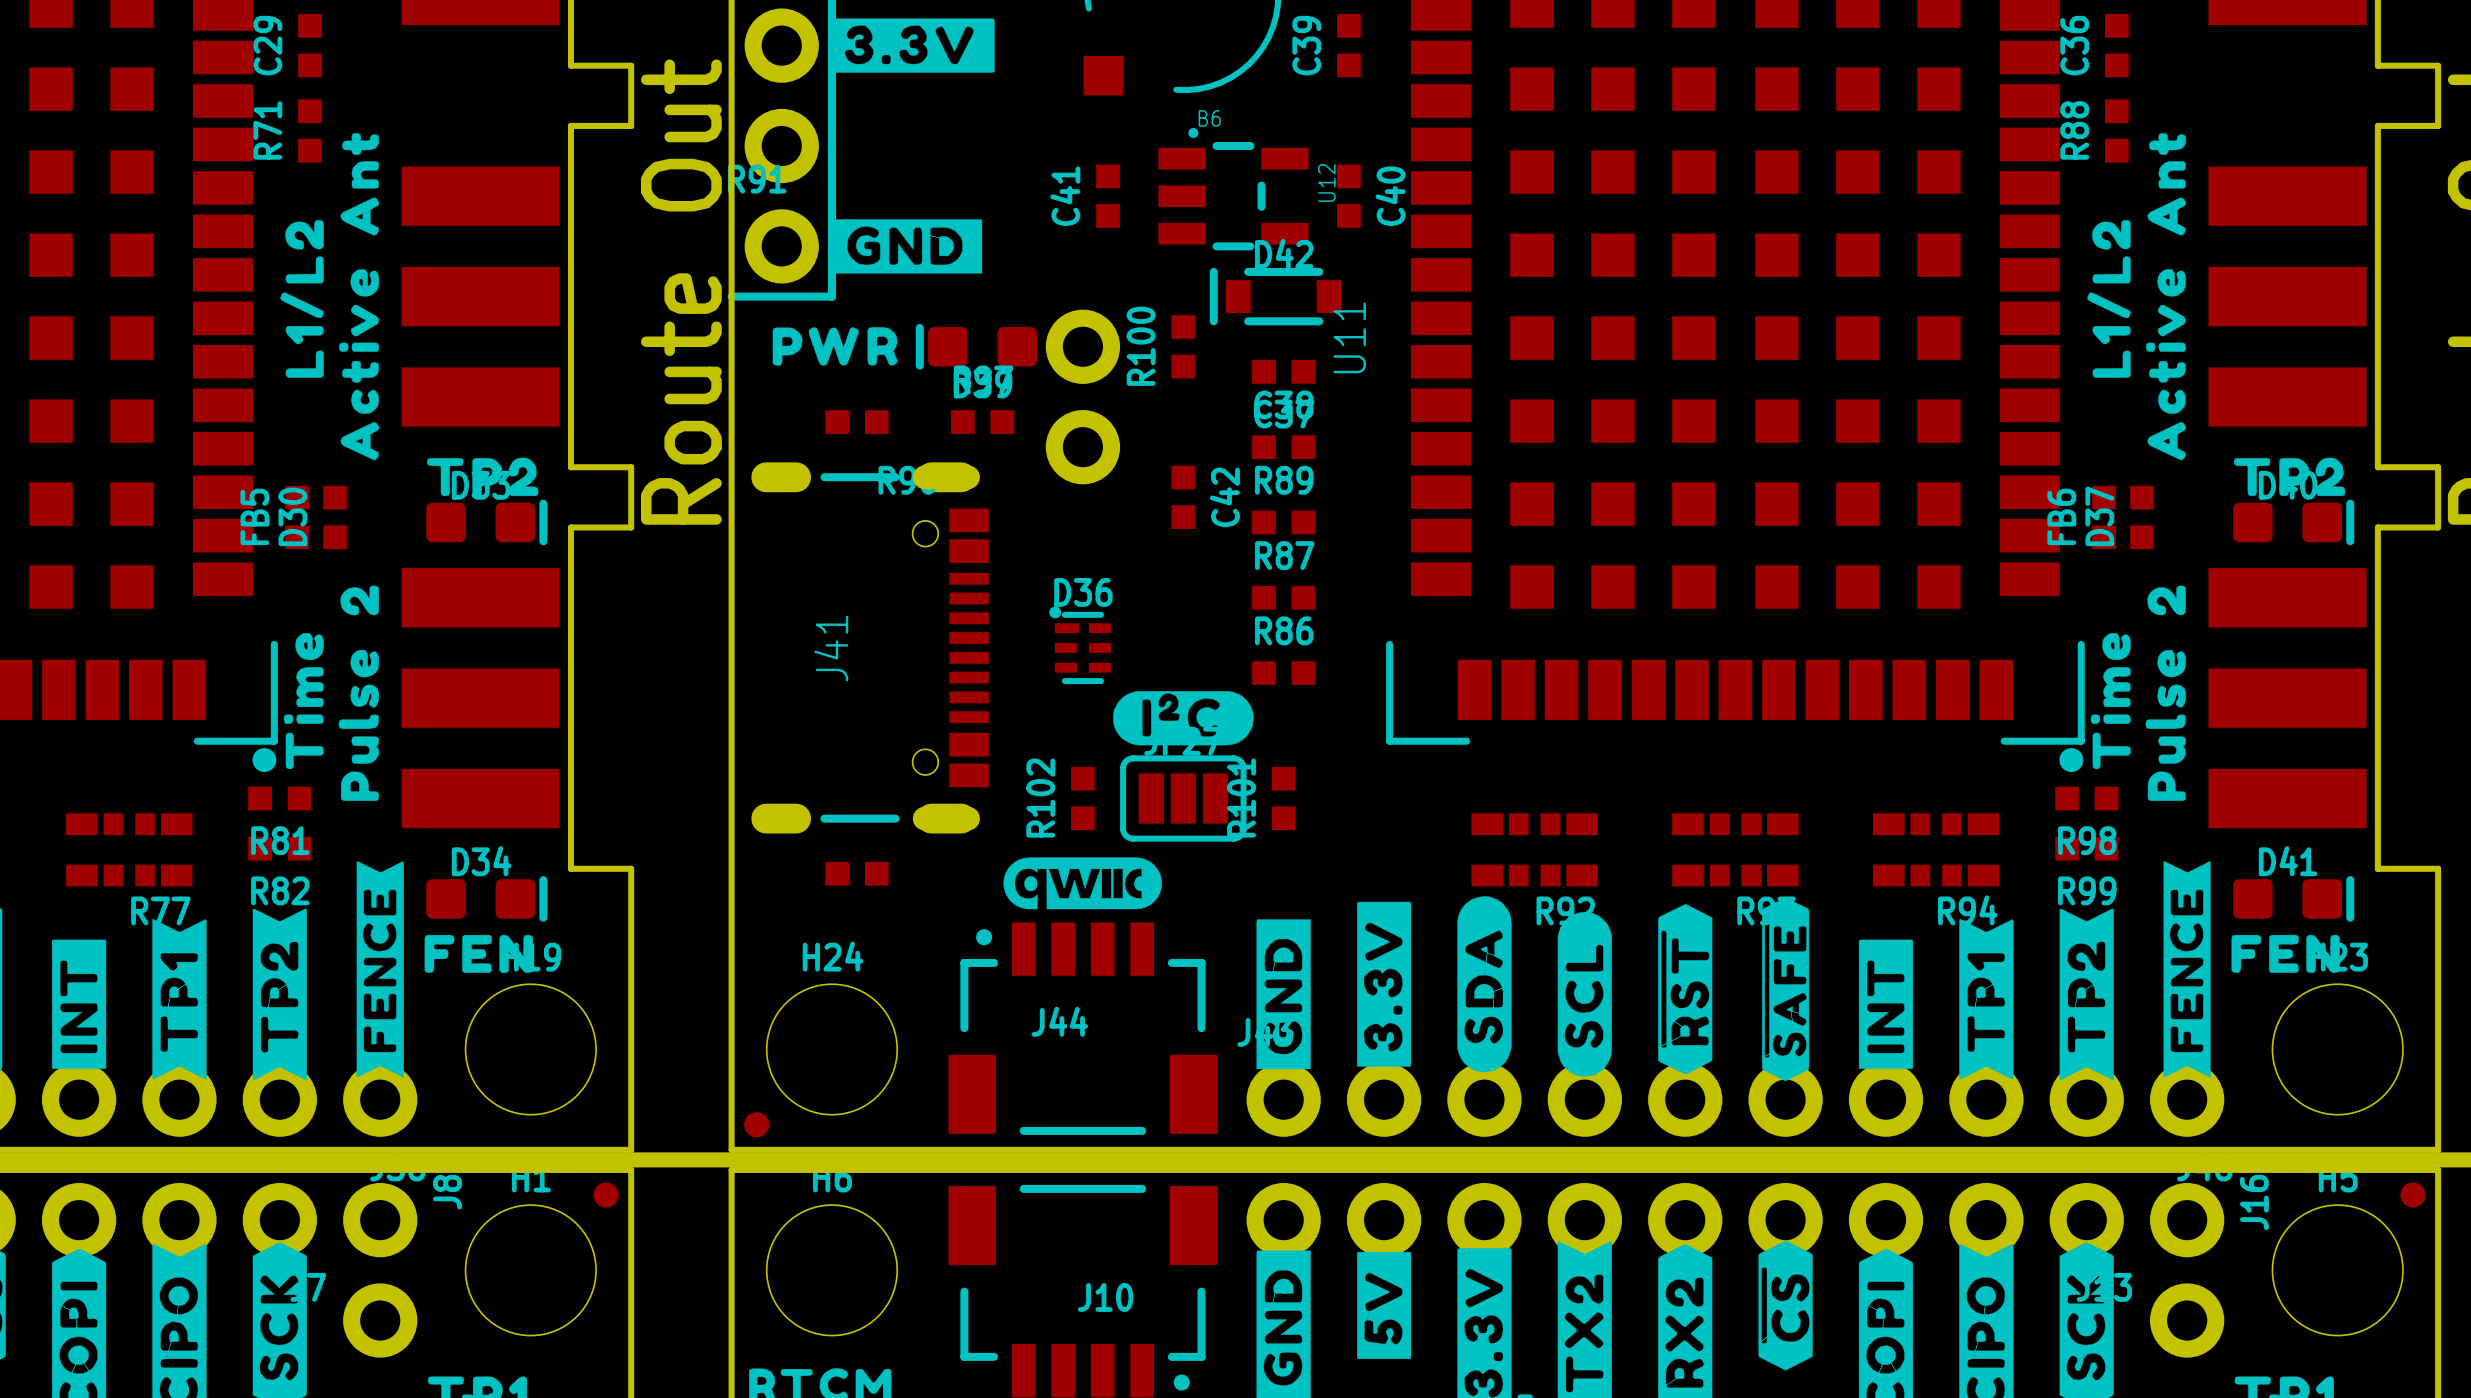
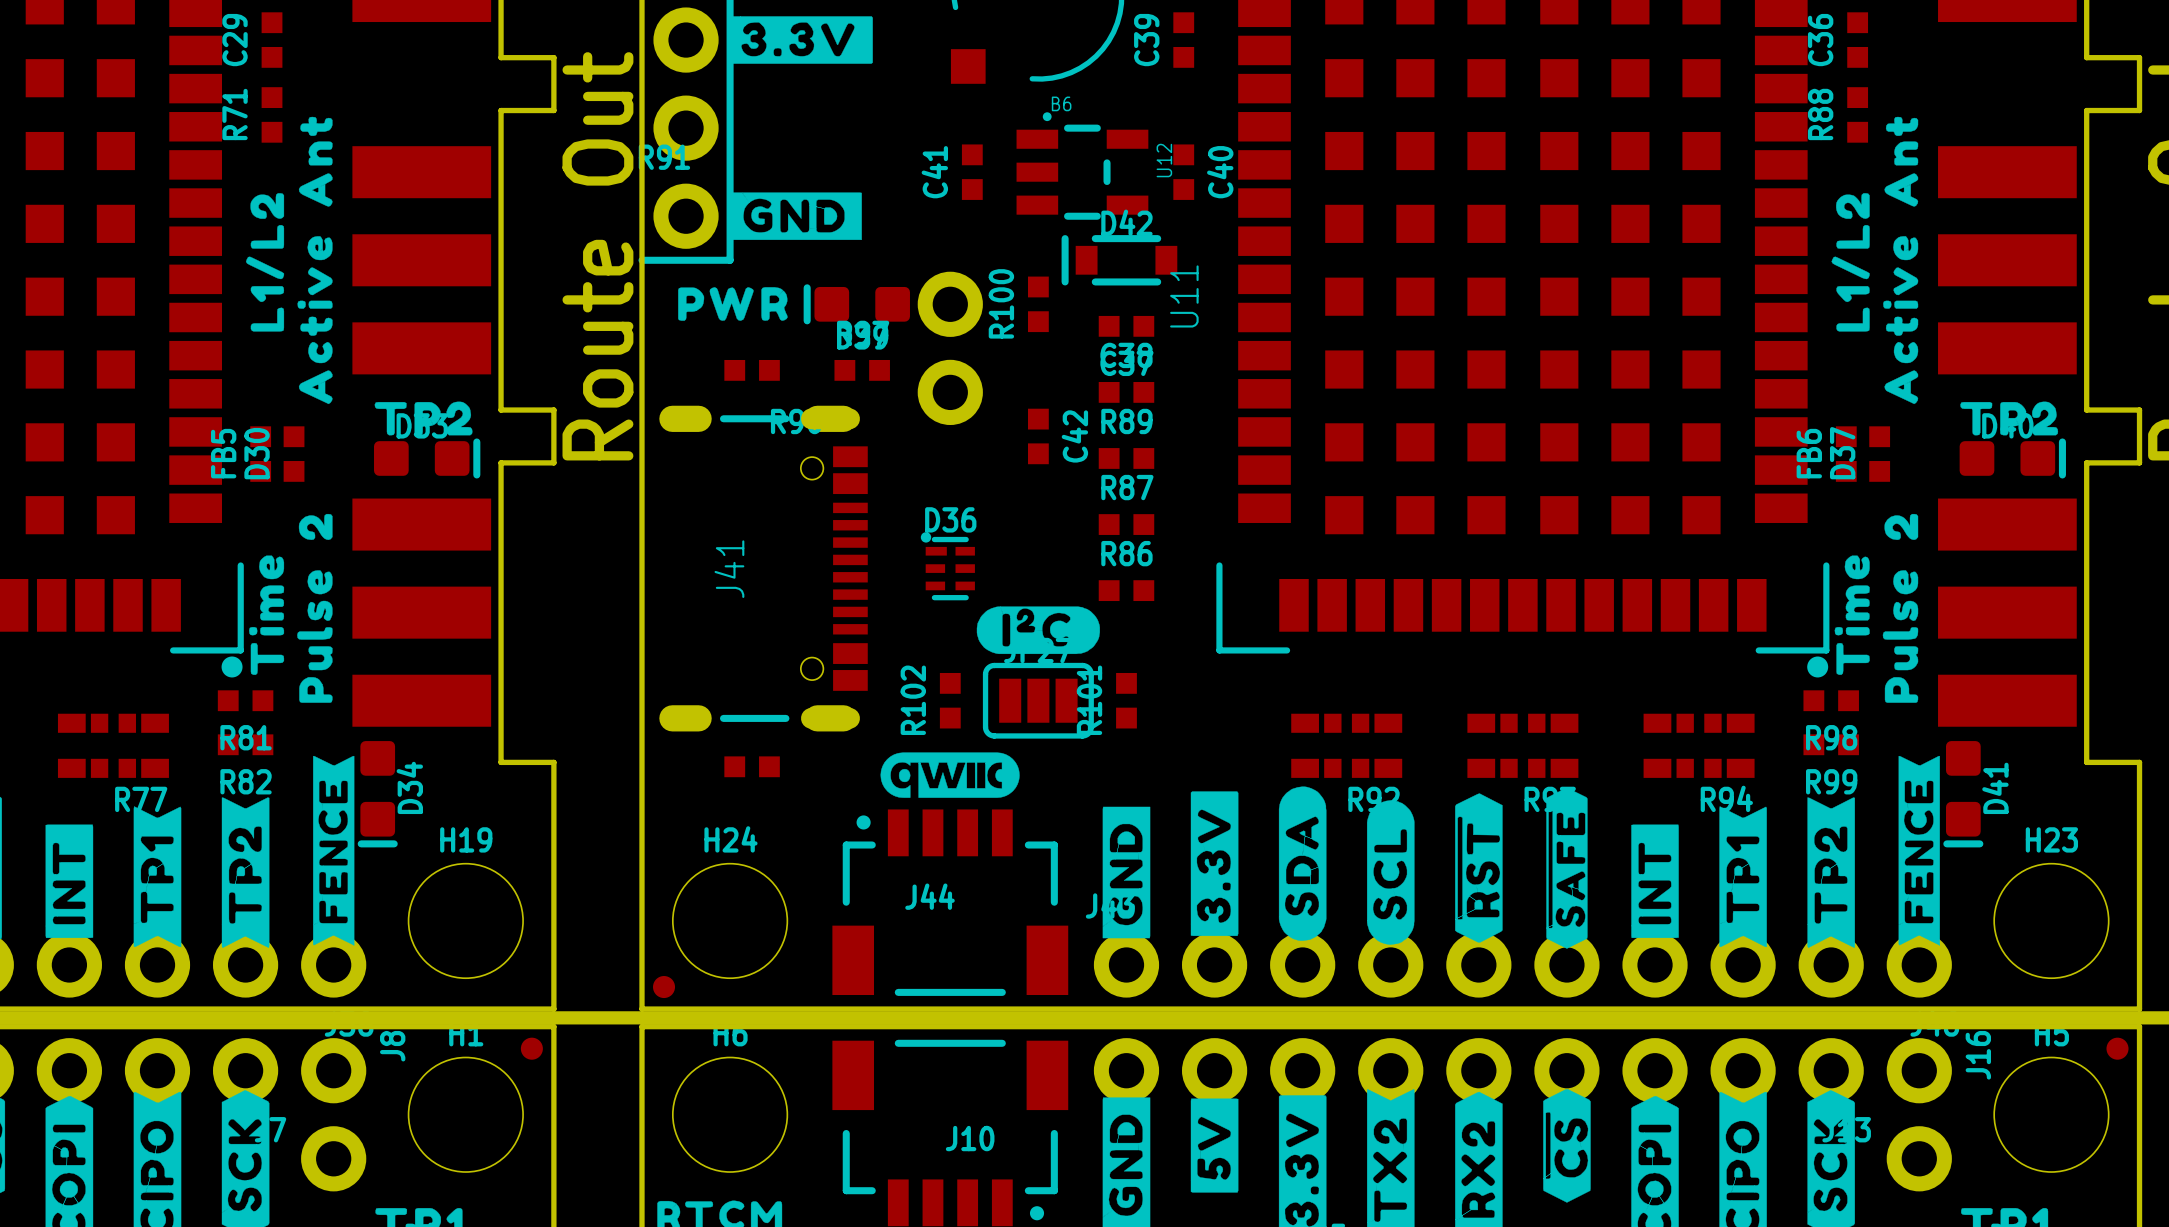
D34 rotation: 0° (486, 898) -> 90° clockwise (377, 794)
D41 rotation: 0° (2293, 898) -> 90° clockwise (1963, 794)
drawing: [424, 934, 533, 973] -> none
drawing: [2231, 934, 2340, 973] -> none

